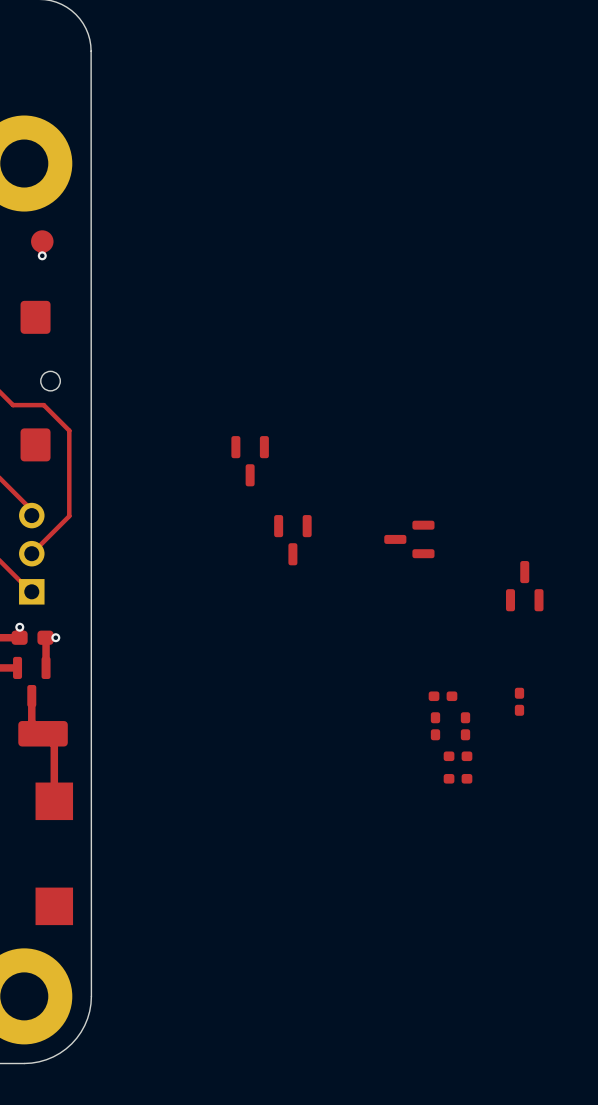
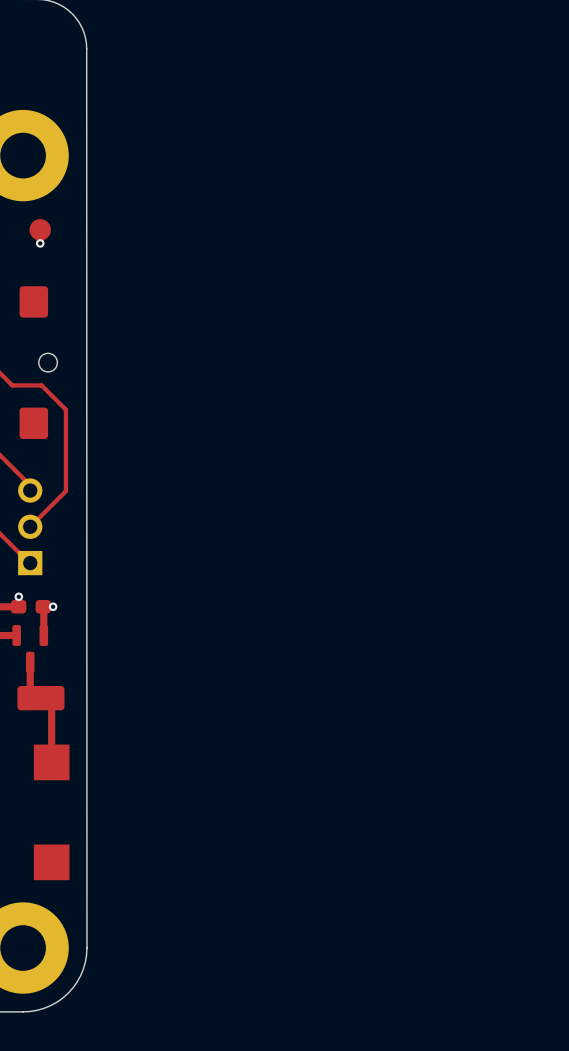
part: (250, 461) -> none
part: (409, 539) -> none
part: (292, 540) -> none
part: (524, 586) -> none
part: (443, 696) -> none
part: (519, 701) -> none
part: (435, 726) -> none
part: (465, 726) -> none
part: (458, 756) -> none
part: (458, 778) -> none

